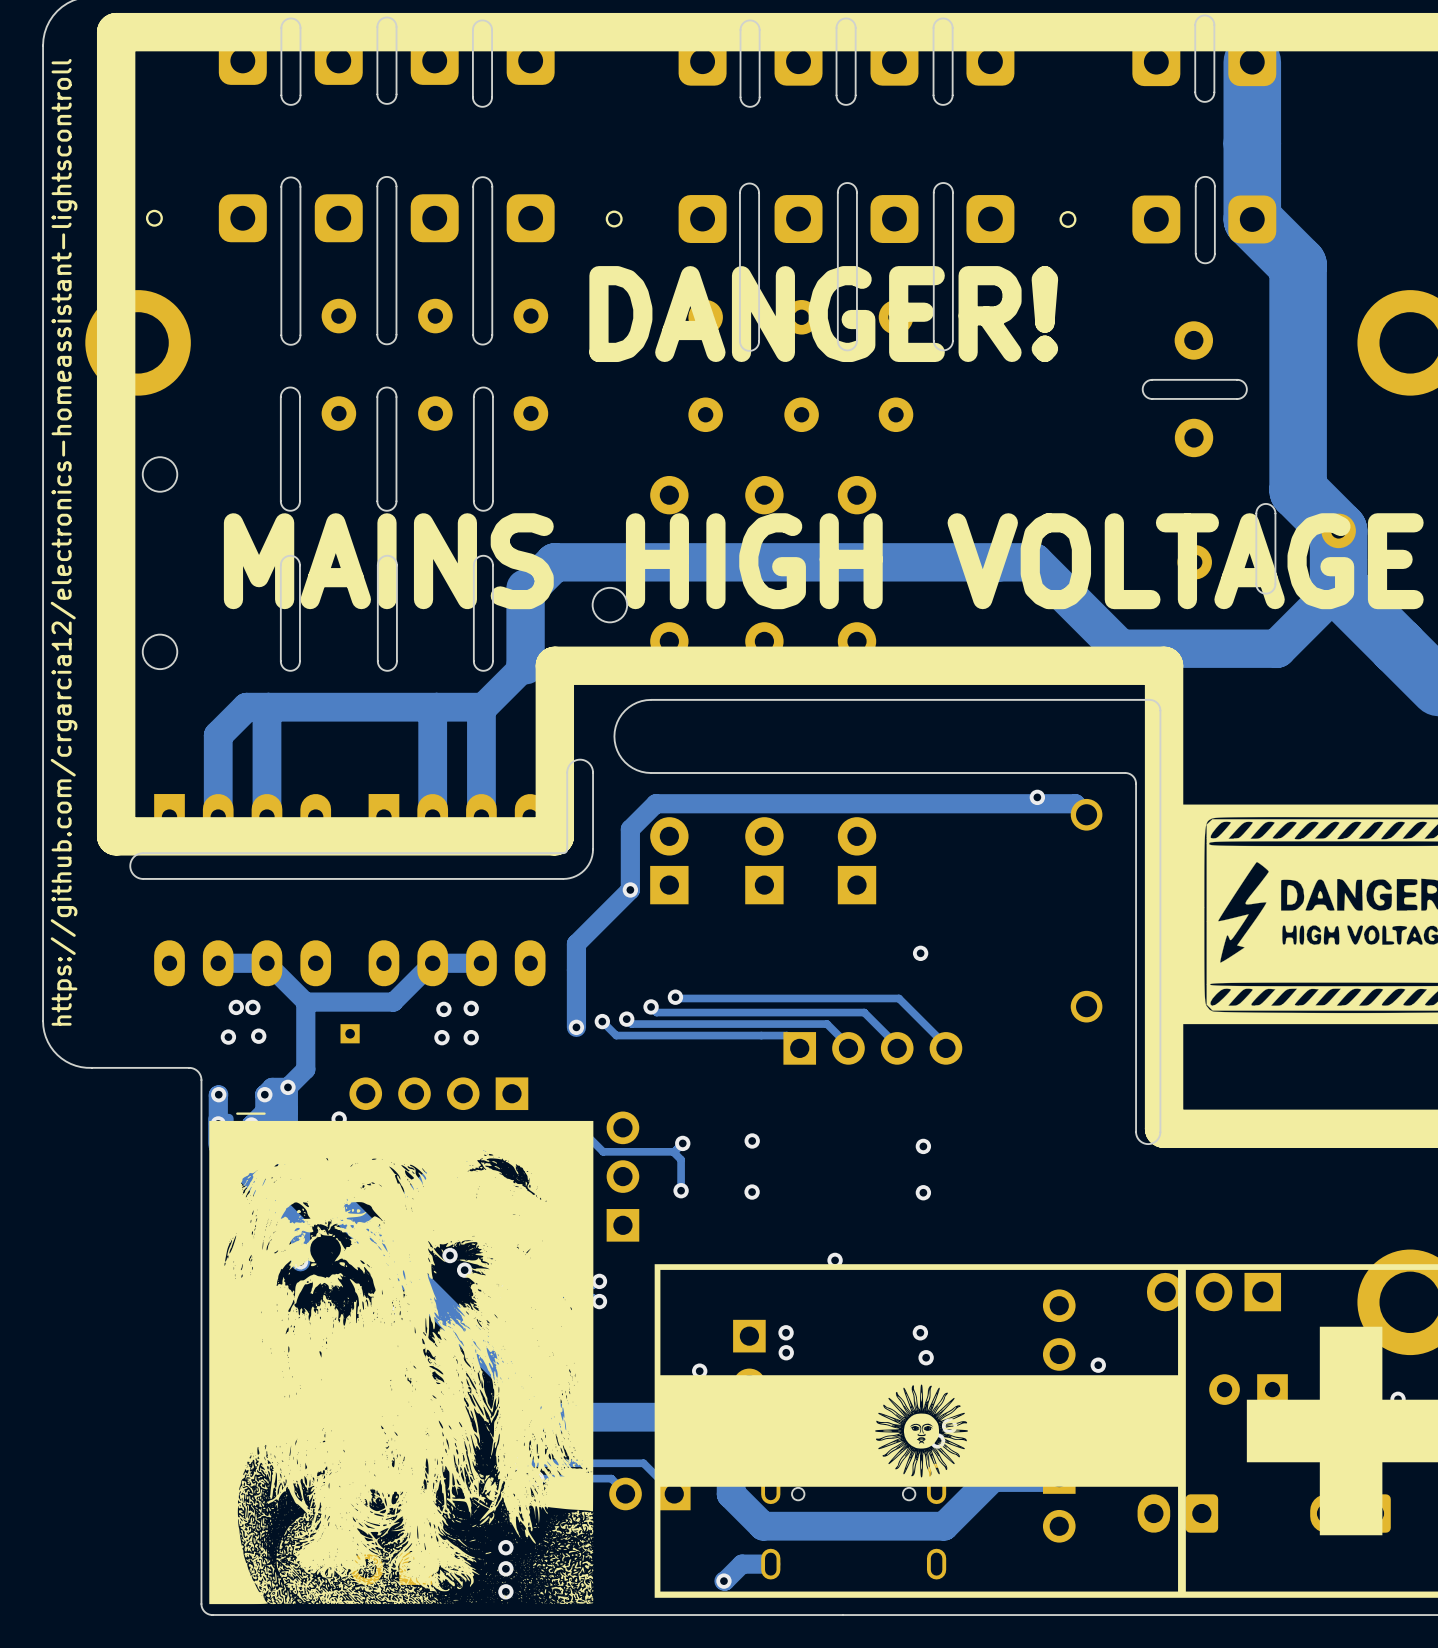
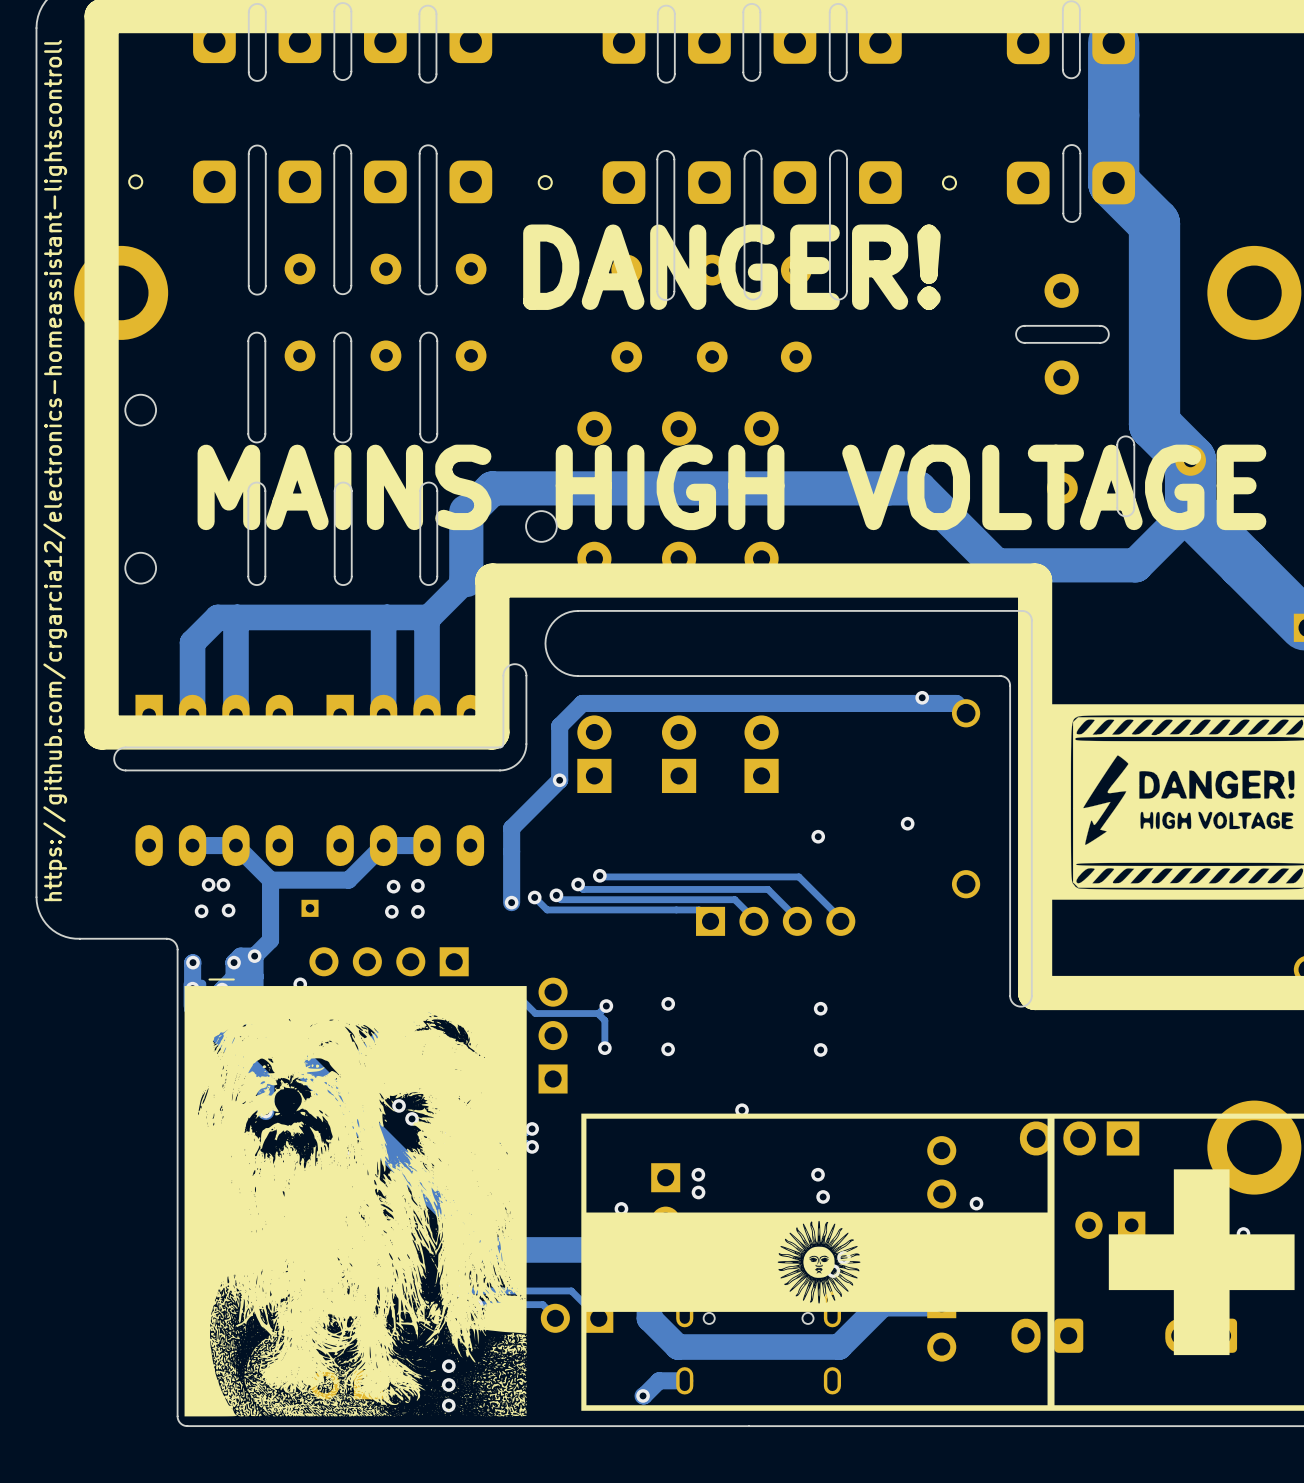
via: none -> (907, 823)

